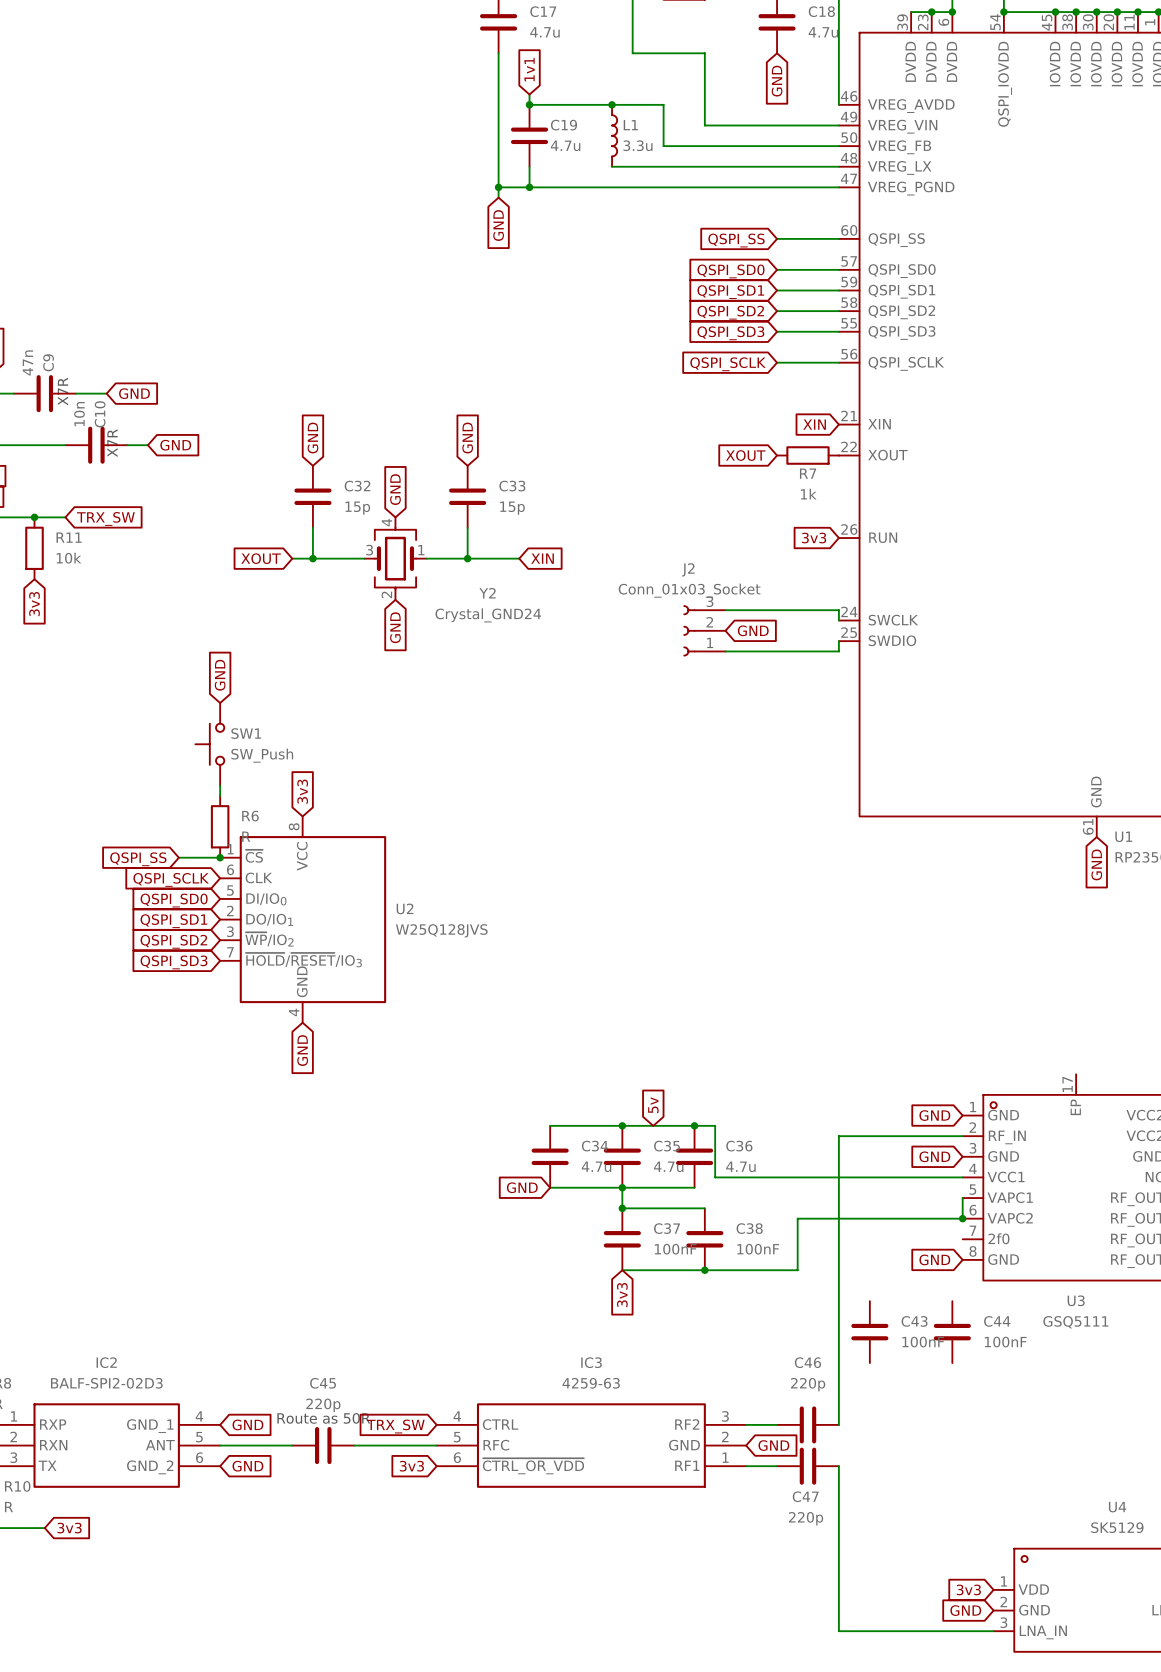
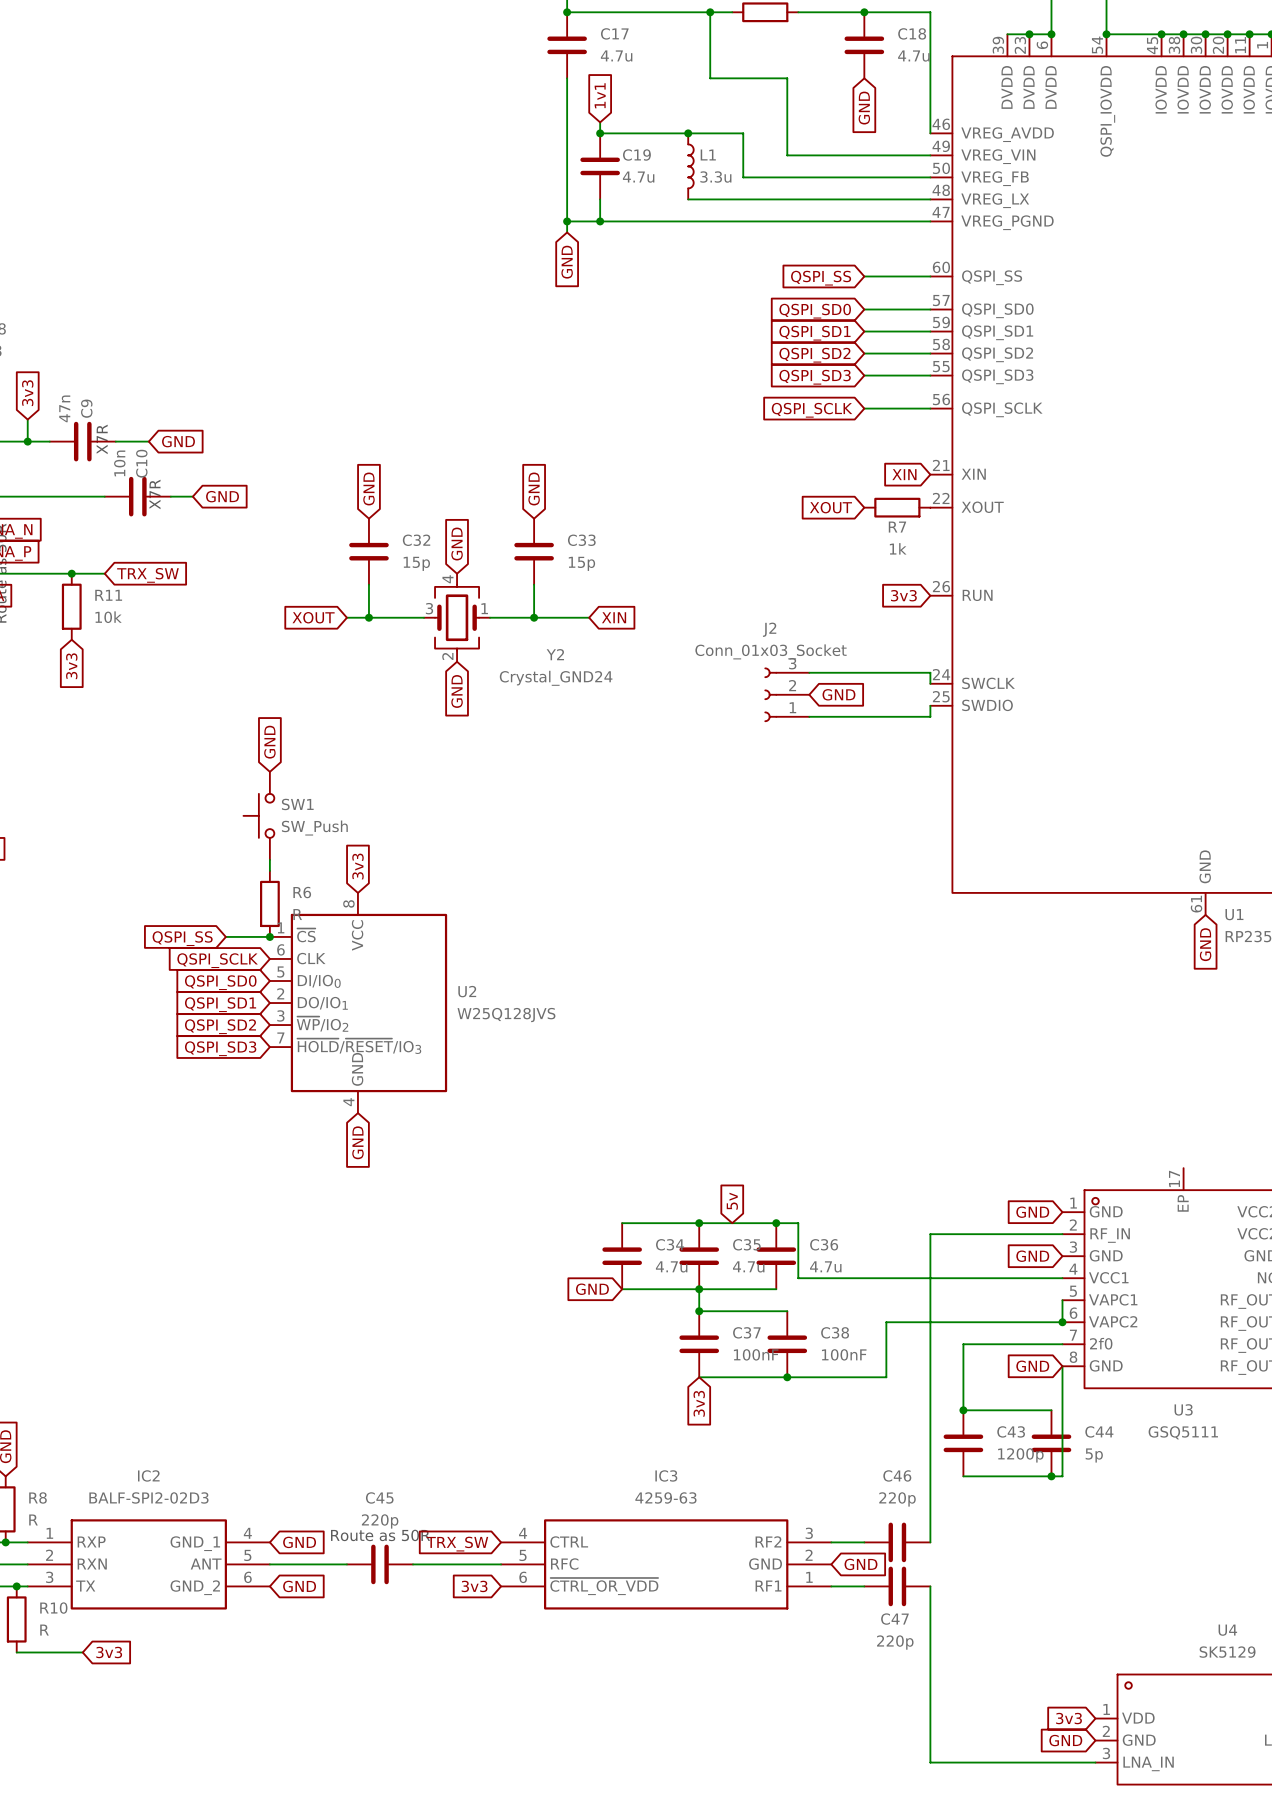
wire: none -> (1062, 1344) (963, 1344) (963, 1410) (1051, 1410)
wire: none -> (1062, 1366) (1062, 1476) (963, 1476)
junction: none -> (963, 1410)
C43 value: 100nF (923, 1342) -> 1200p (1020, 1455)
C44 value: 100nF (1005, 1342) -> 5p (1094, 1455)
junction: none -> (1051, 1476)

